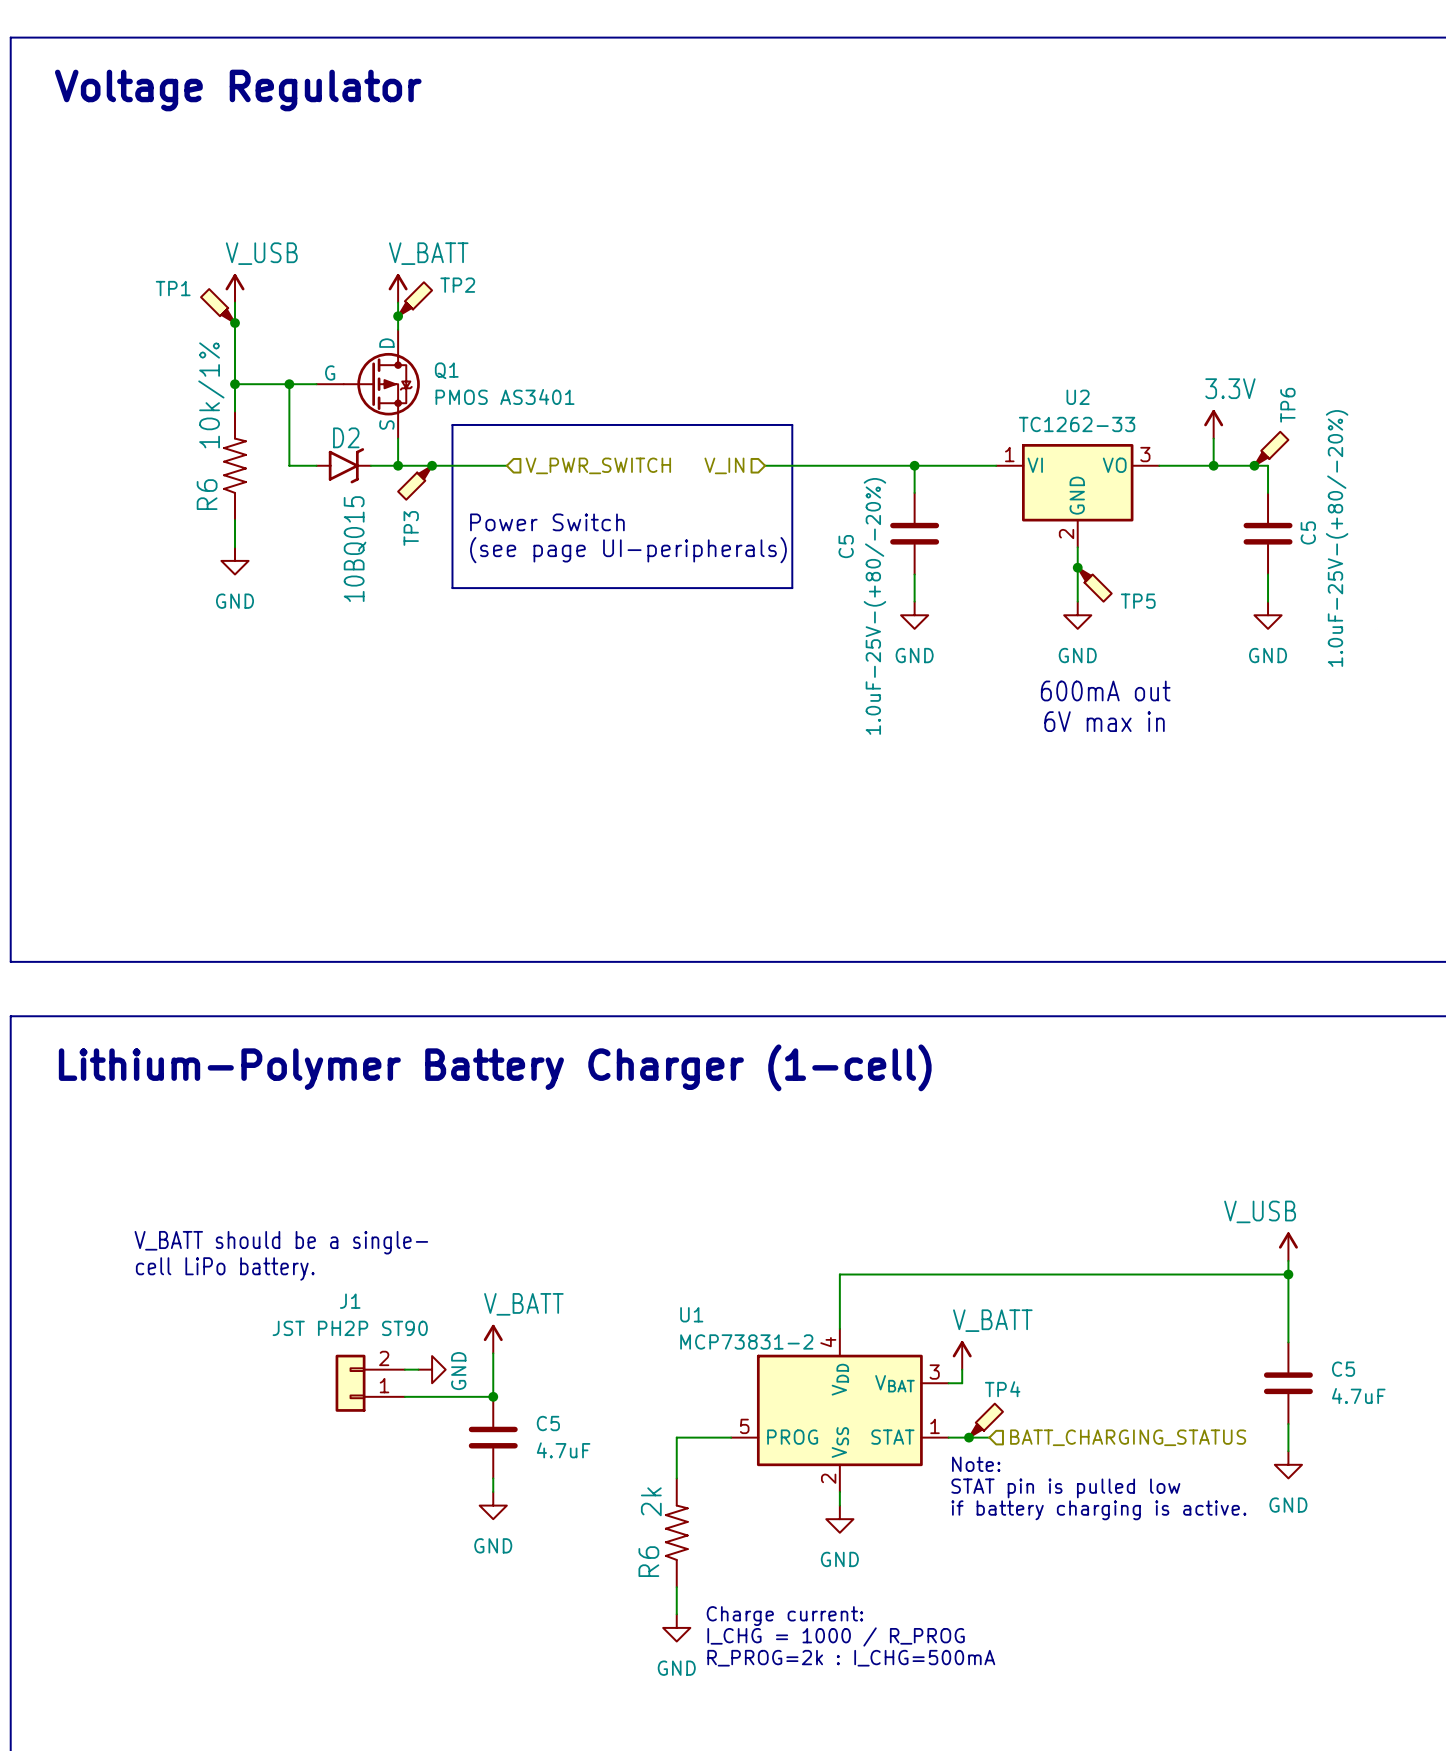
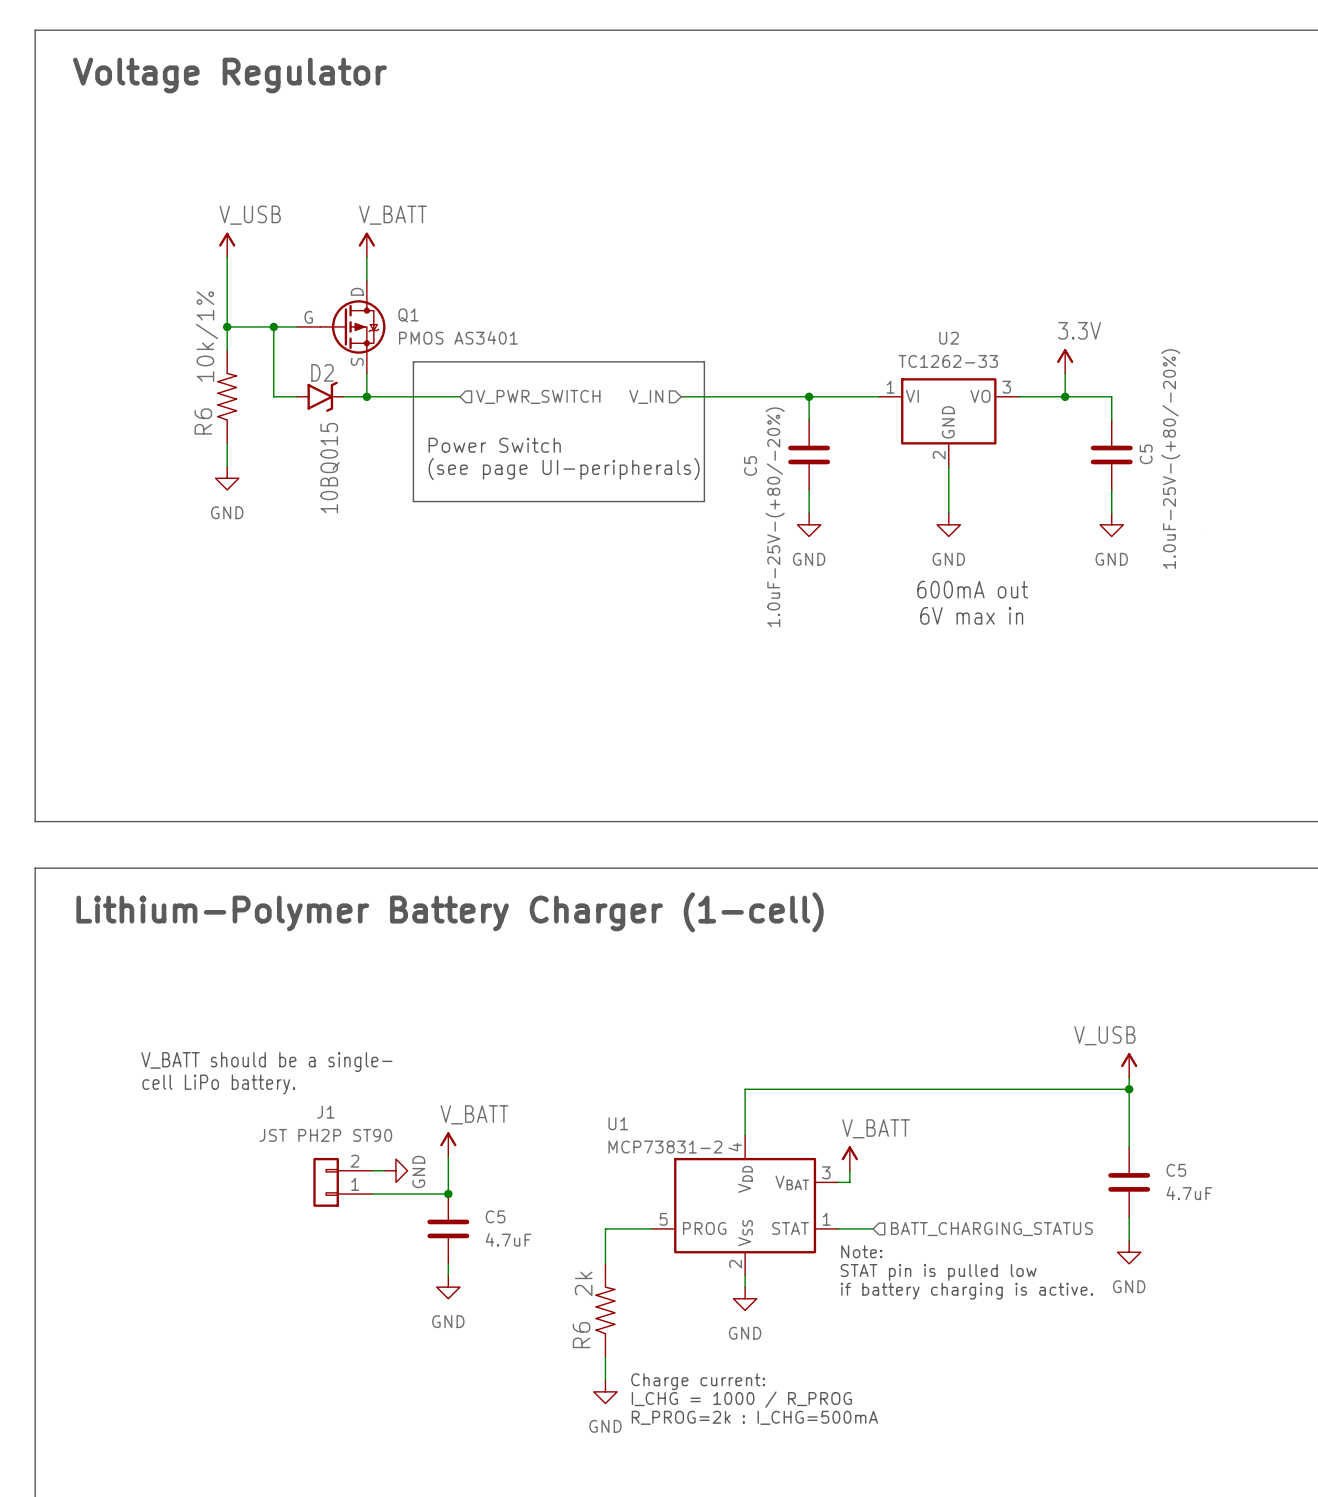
TP2: (415, 299) -> none
TP1: (218, 306) -> none
junction: (398, 316) -> none
junction: (235, 323) -> none
TP6: (1271, 448) -> none
junction: (432, 465) -> none
junction: (1254, 465) -> none
TP3: (415, 482) -> none
junction: (1077, 567) -> none
TP5: (1094, 584) -> none
TP4: (985, 1420) -> none
junction: (968, 1437) -> none

